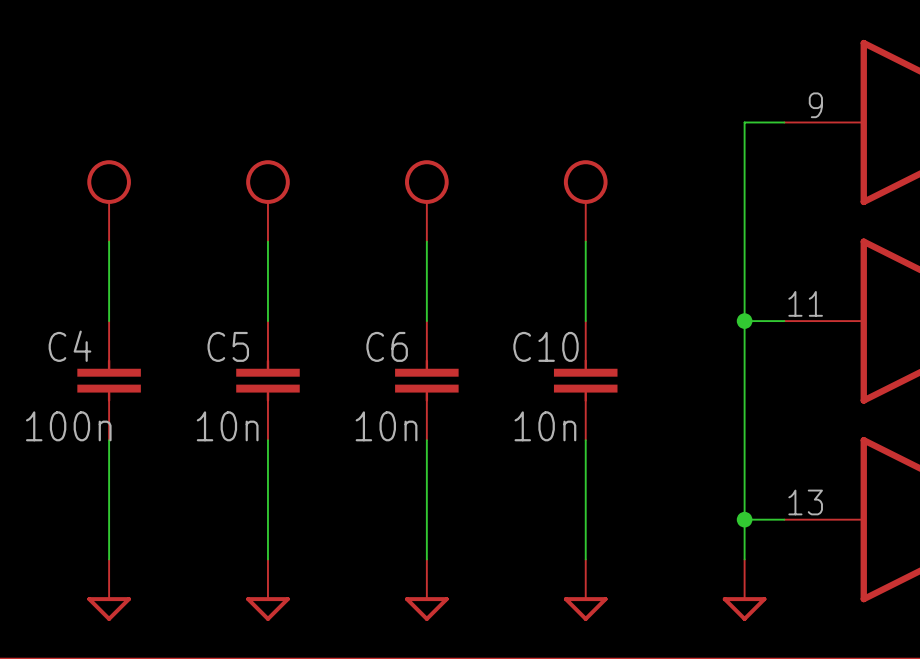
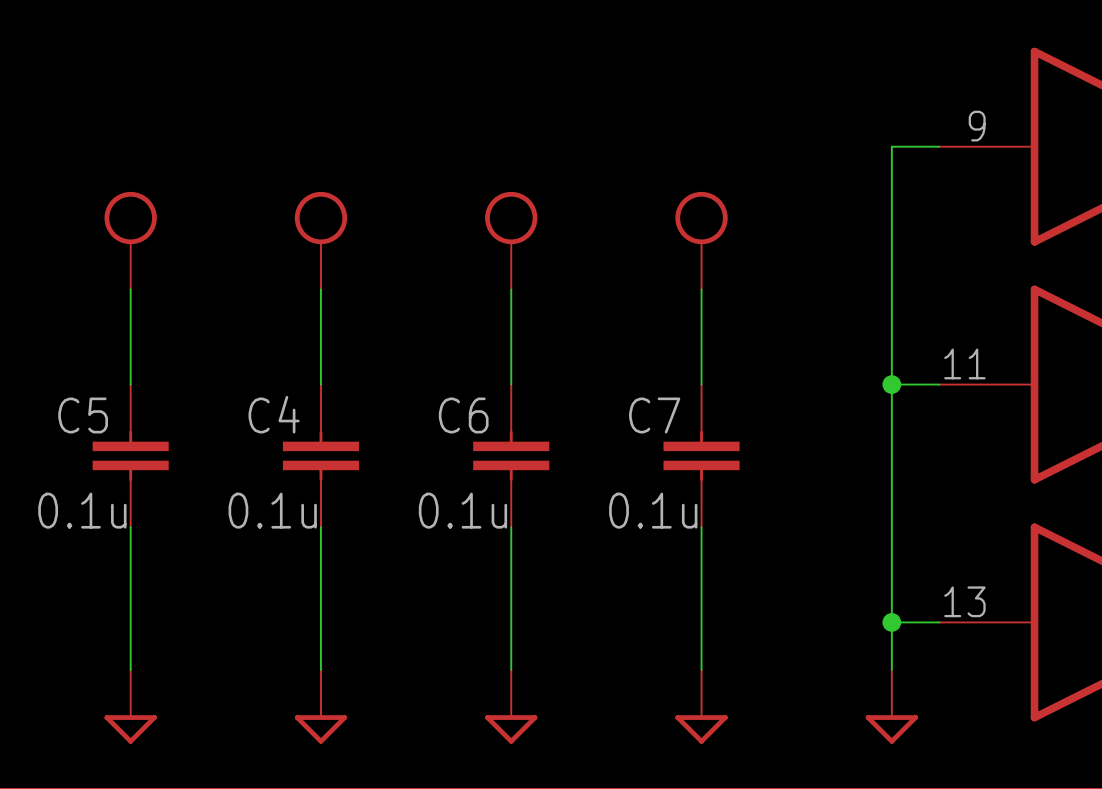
C4 name: C4 (69, 346) -> C5 (83, 415)
C5 name: C5 (228, 346) -> C4 (274, 414)
C10 name: C10 (546, 346) -> C7 (654, 415)
C4 value: 100n (68, 426) -> 0.1u (82, 510)
C5 value: 10n (227, 426) -> 0.1u (272, 510)
C6 value: 10n (386, 426) -> 0.1u (462, 510)
C10 value: 10n (545, 426) -> 0.1u (653, 510)

